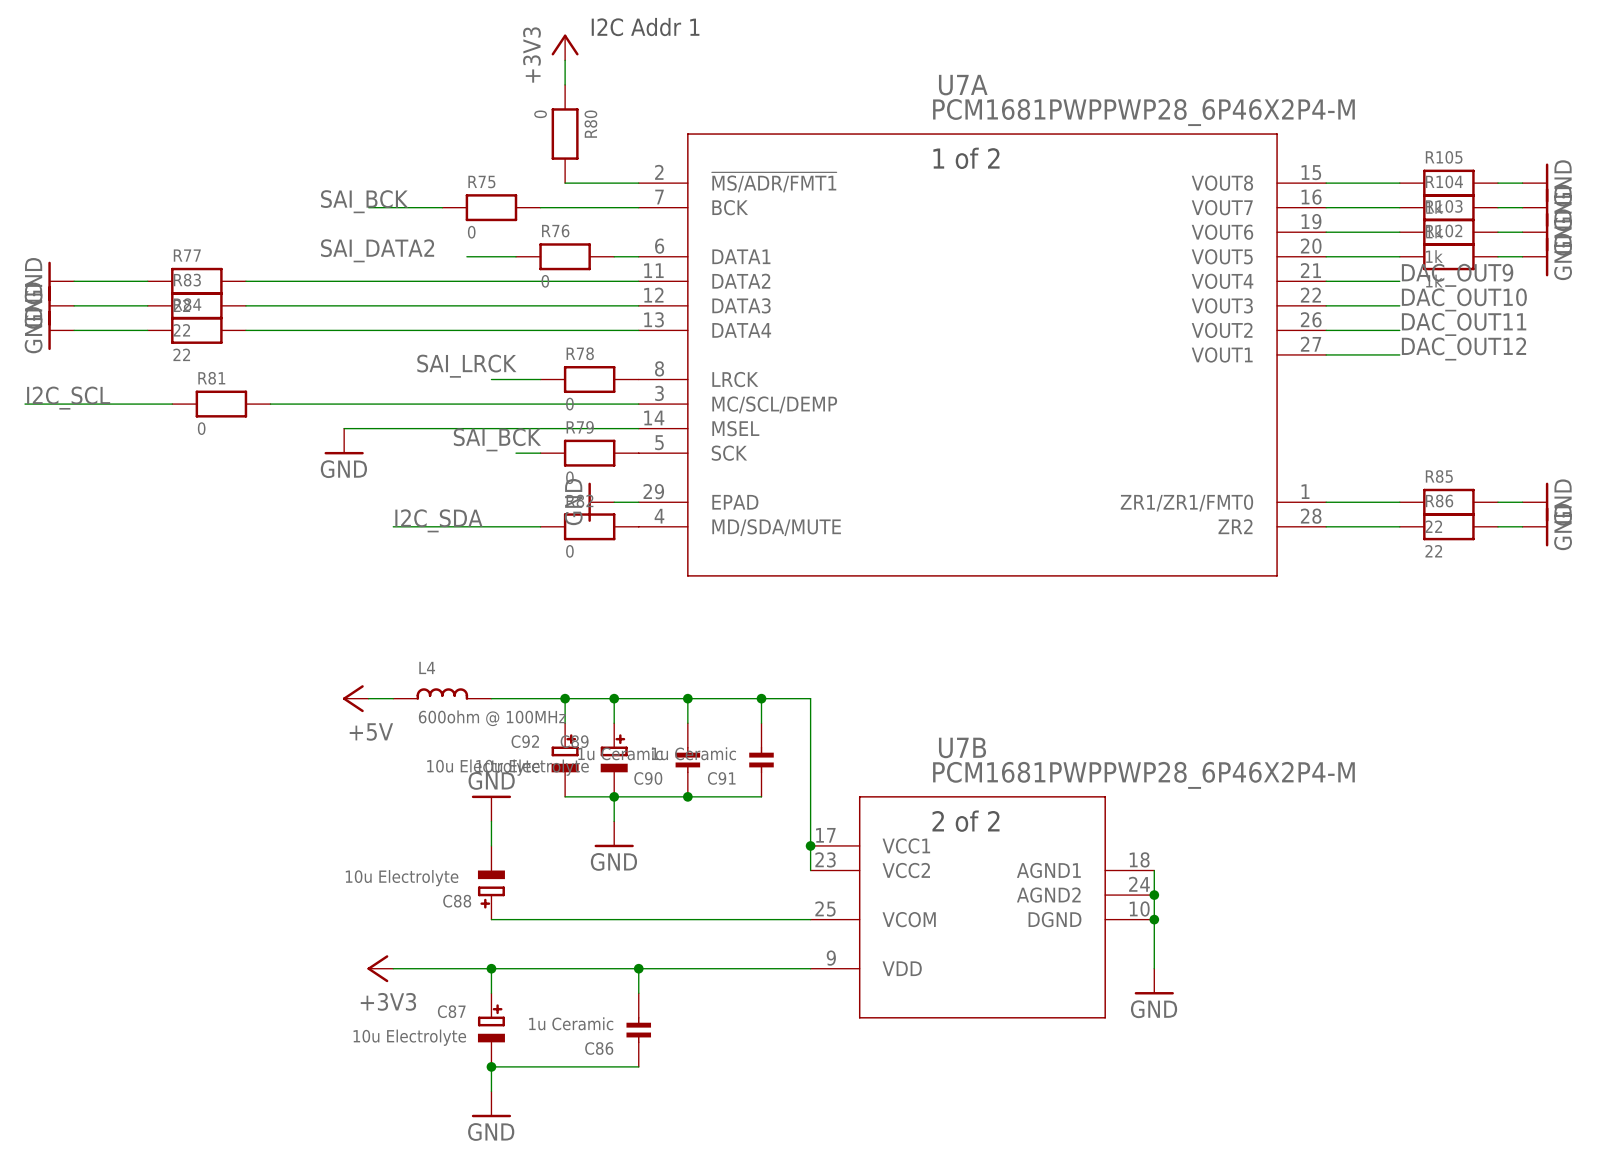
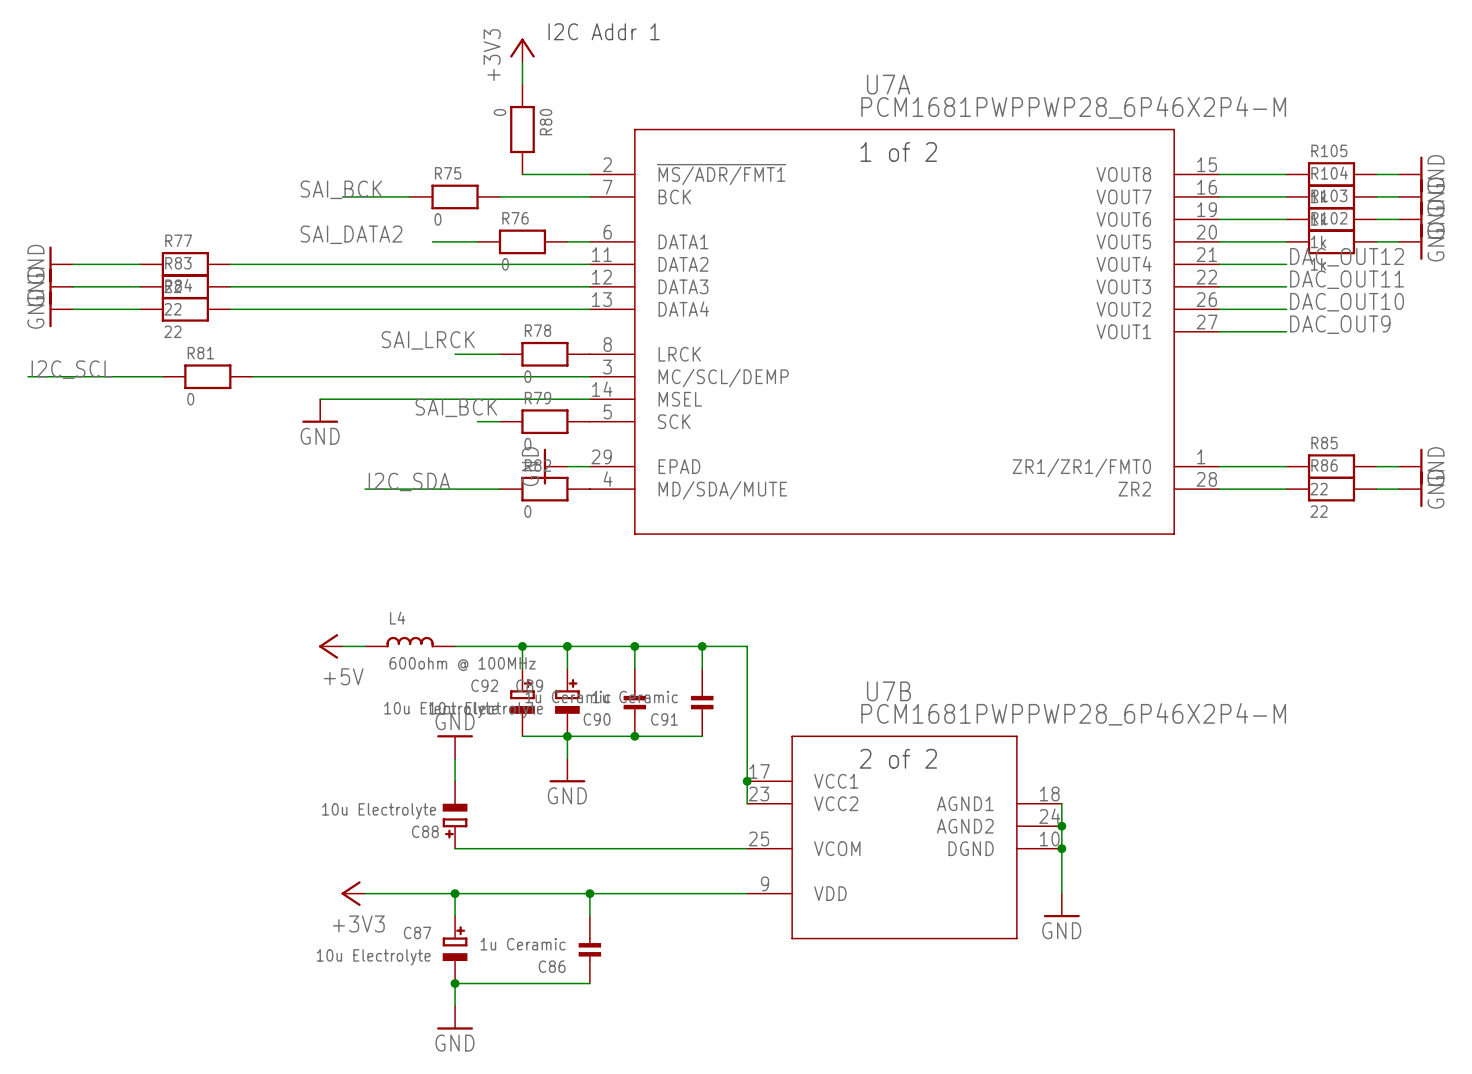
label: DAC_OUT9 (1457, 275) -> DAC_OUT12 (1347, 257)
label: DAC_OUT10 (1464, 299) -> DAC_OUT11 (1347, 279)
label: DAC_OUT11 (1464, 324) -> DAC_OUT10 (1347, 302)
label: DAC_OUT12 (1463, 348) -> DAC_OUT9 (1340, 324)

